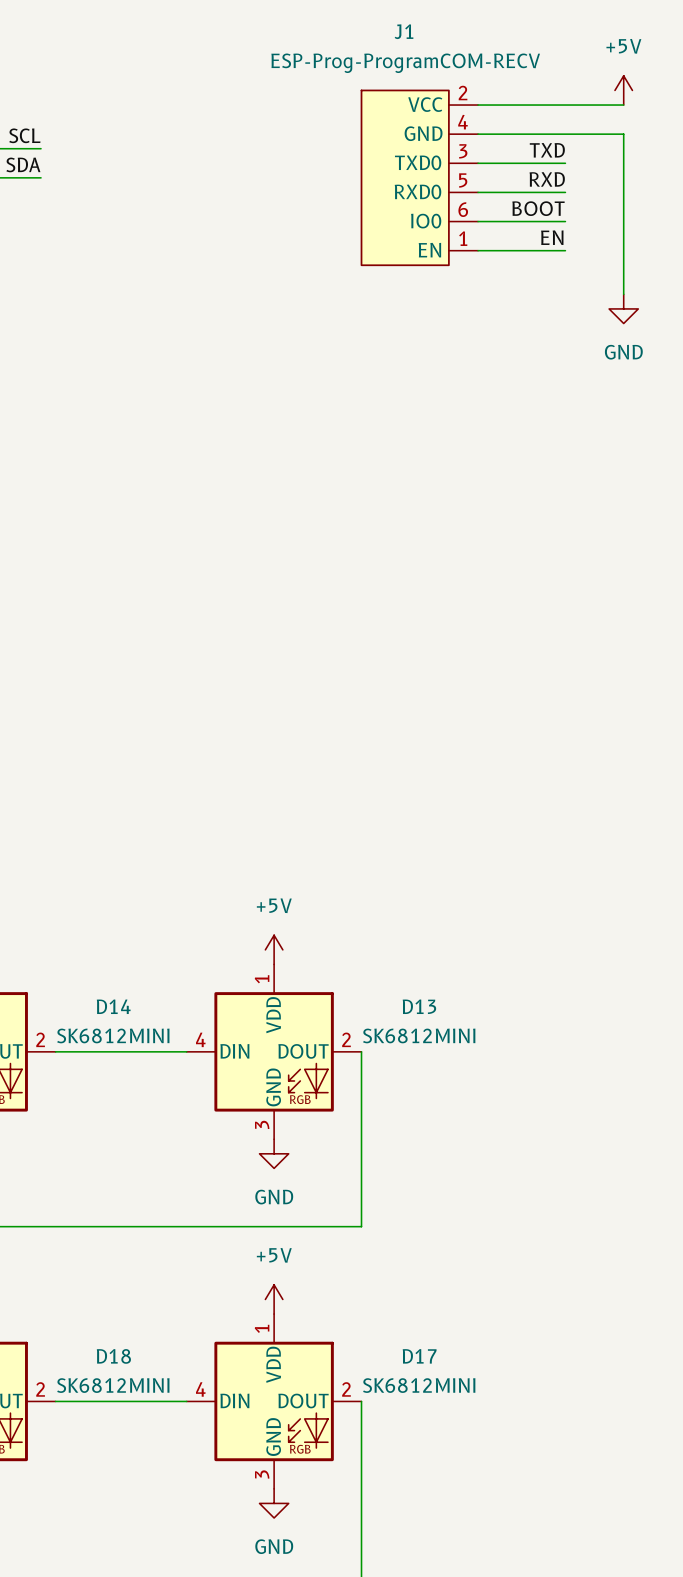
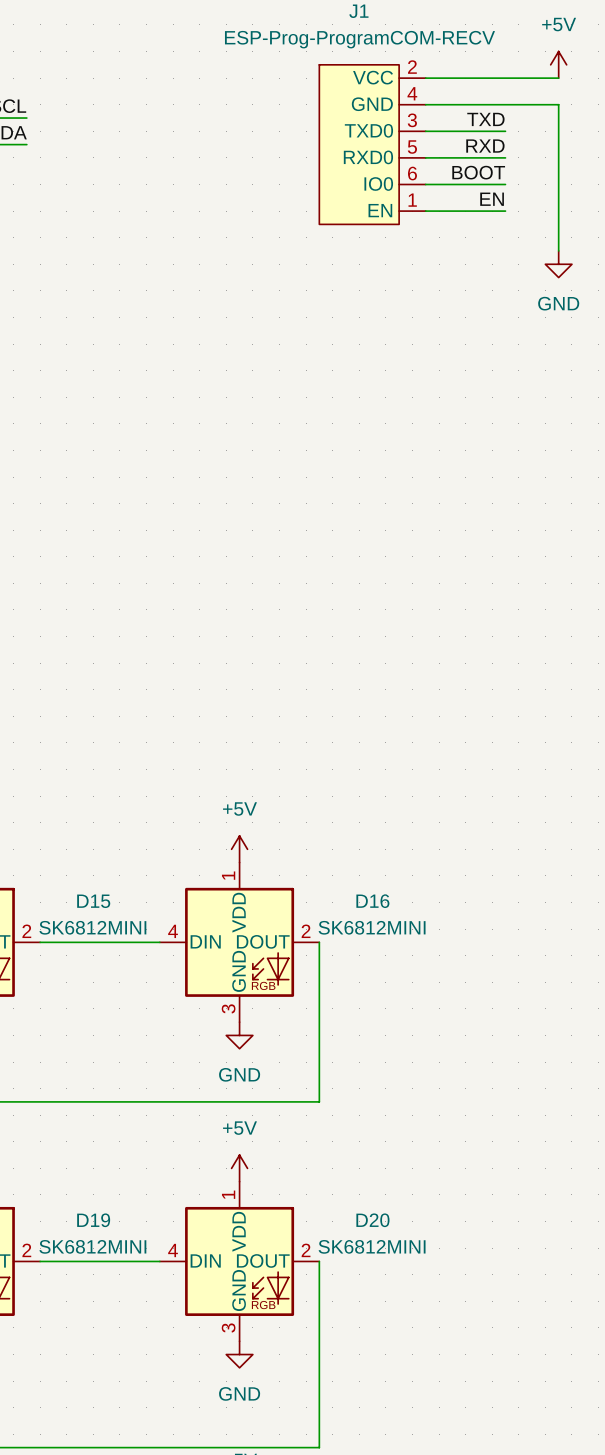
D14 name: D14 (113, 1006) -> D15 (93, 901)
D13 name: D13 (419, 1006) -> D16 (372, 901)
D18 name: D18 (113, 1356) -> D19 (93, 1220)
D17 name: D17 (419, 1356) -> D20 (372, 1220)

